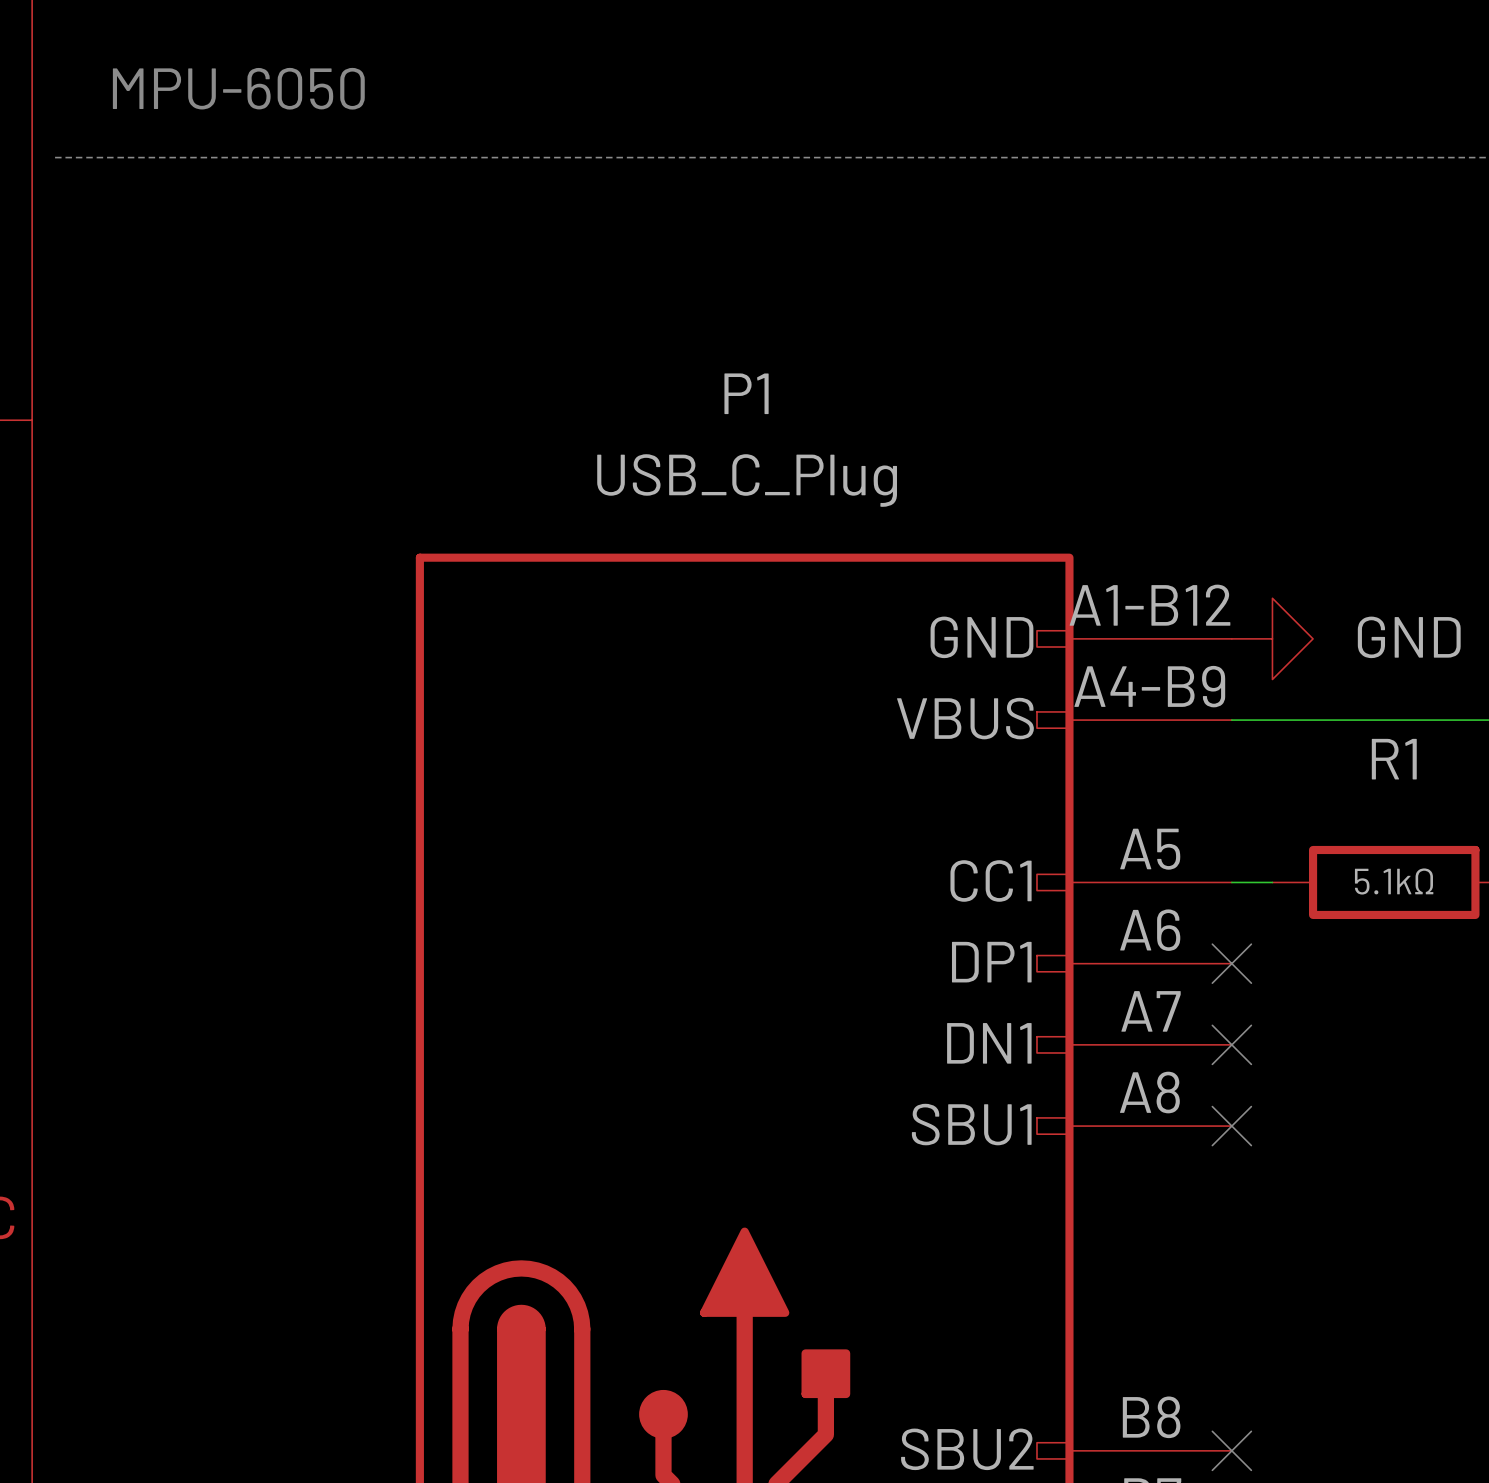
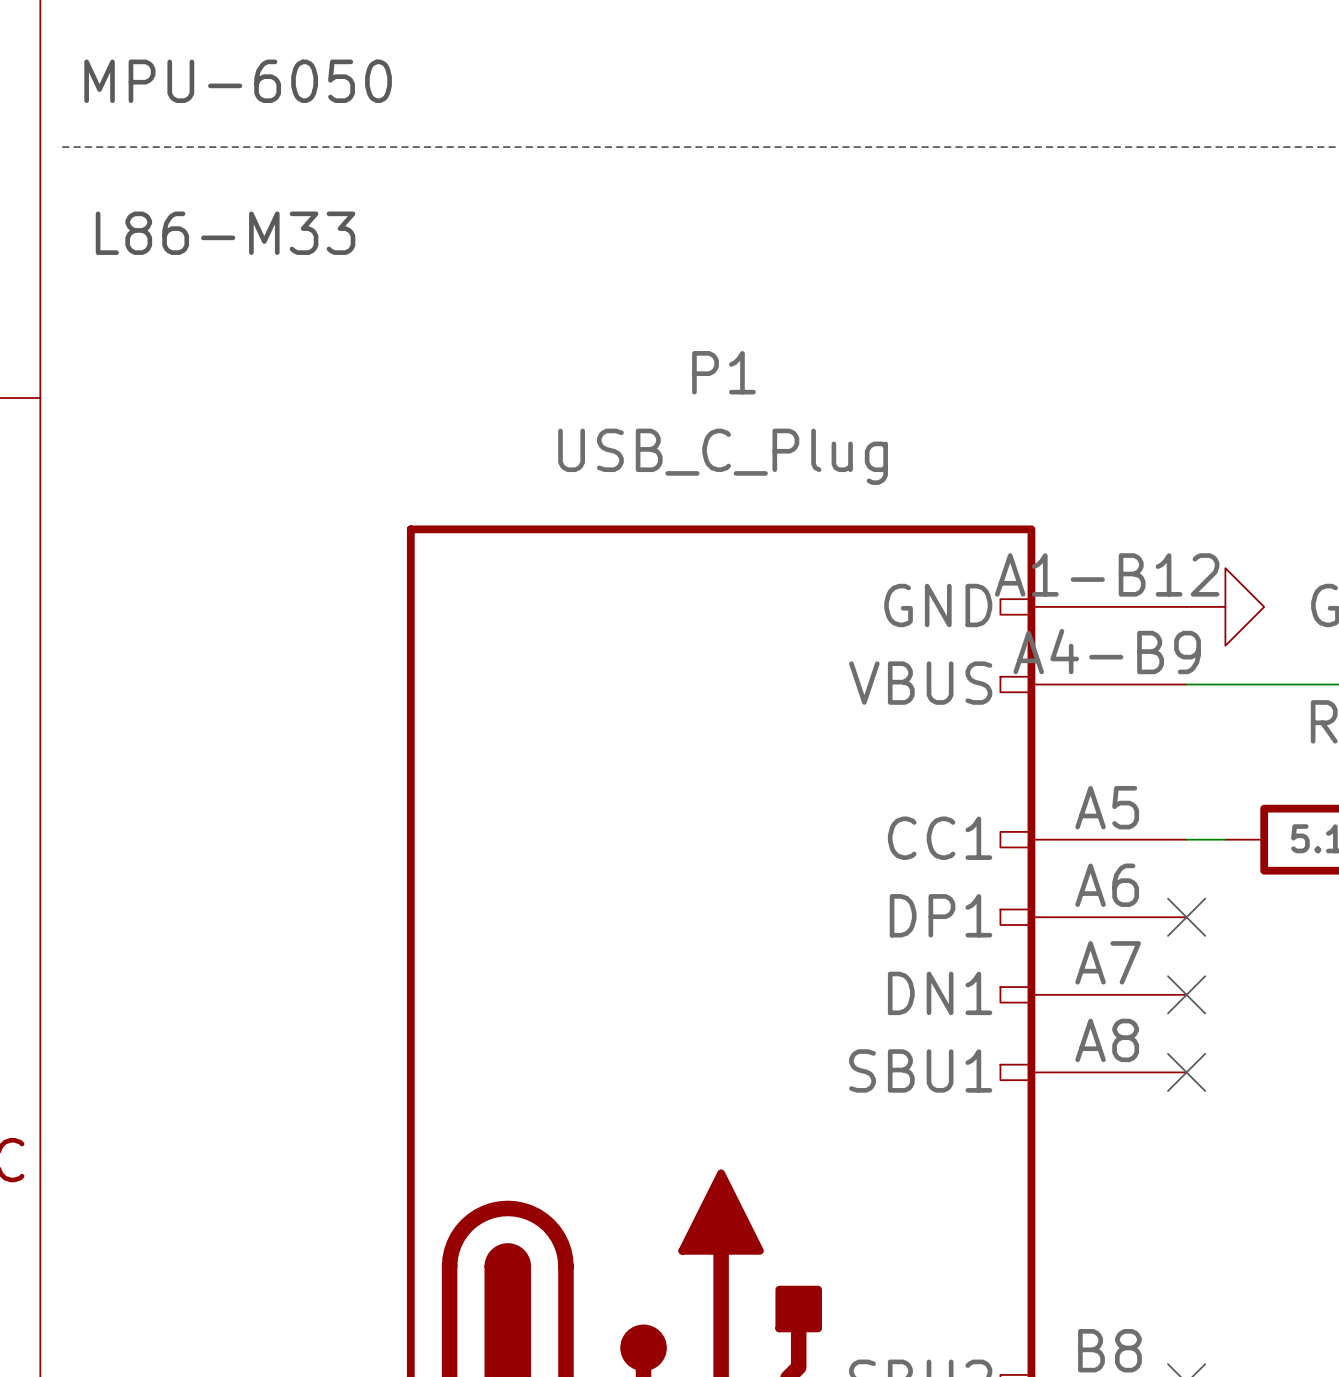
text: none -> L86-M33 (225, 233)

